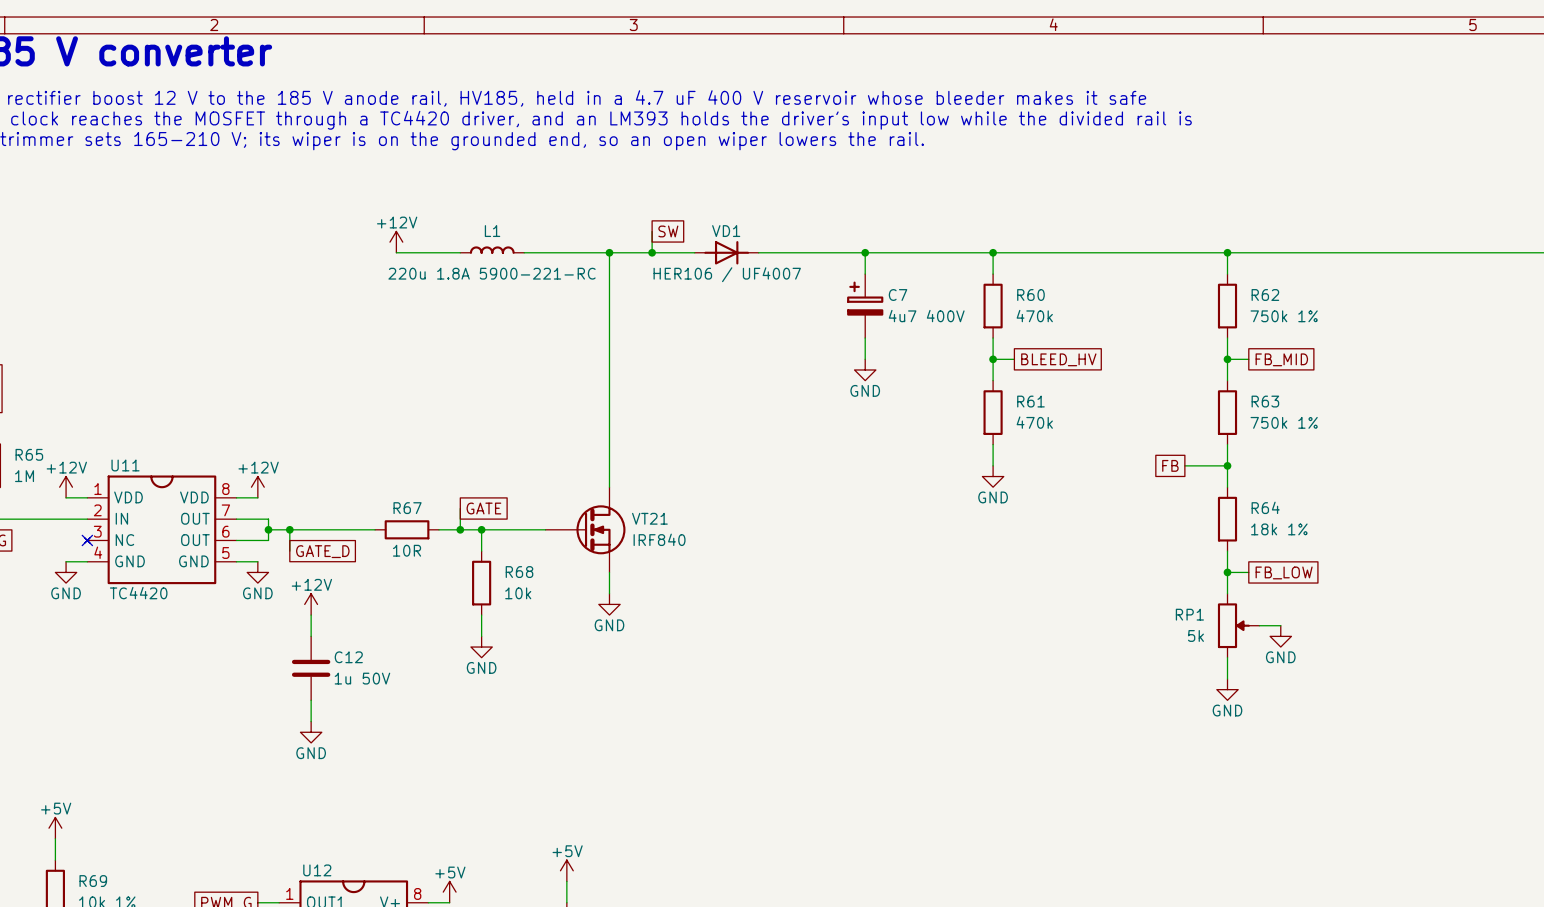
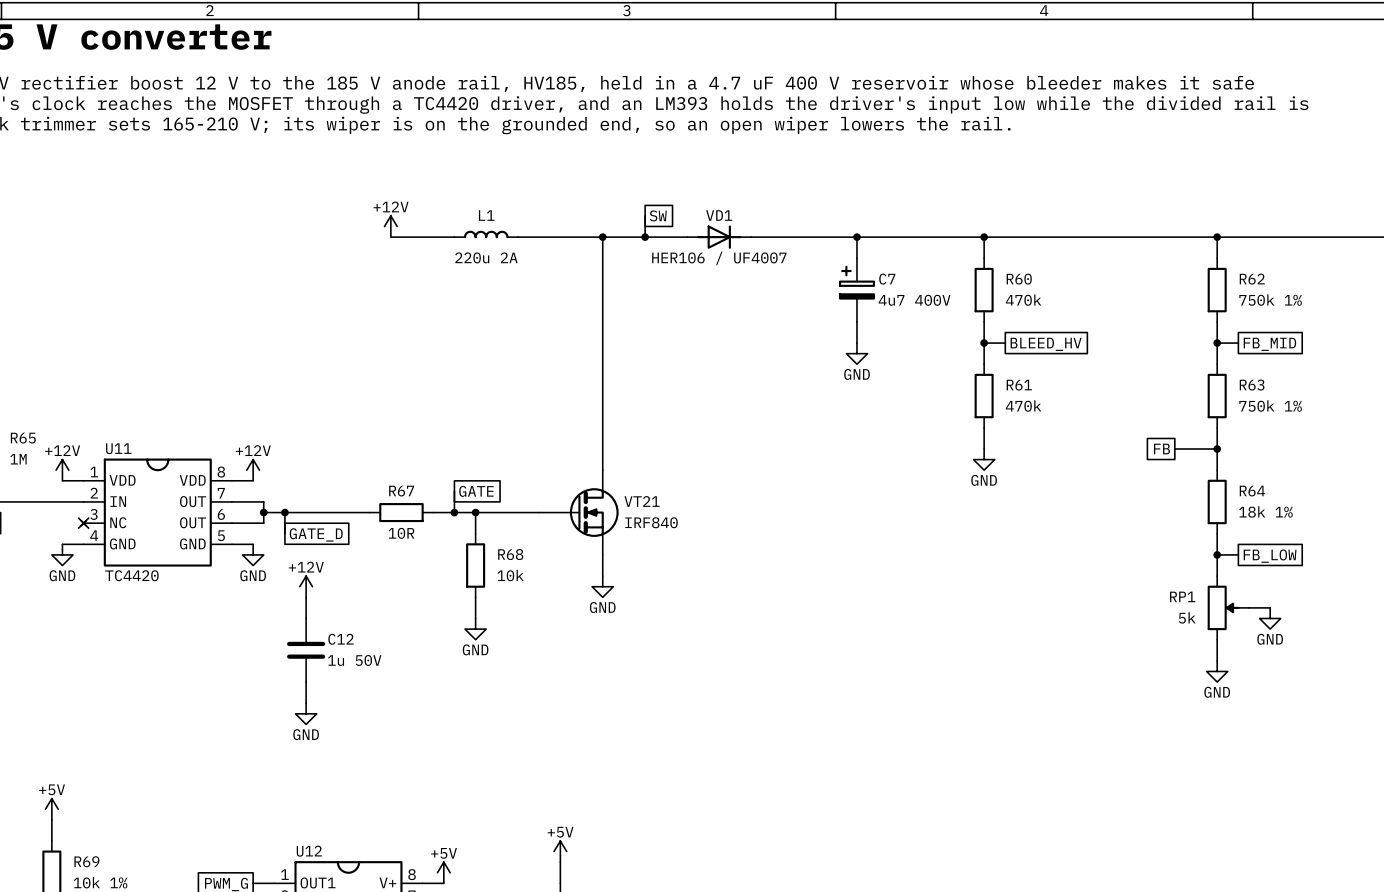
L1 value: 220u 1.8A 5900-221-RC (492, 273) -> 220u 2A (486, 257)

